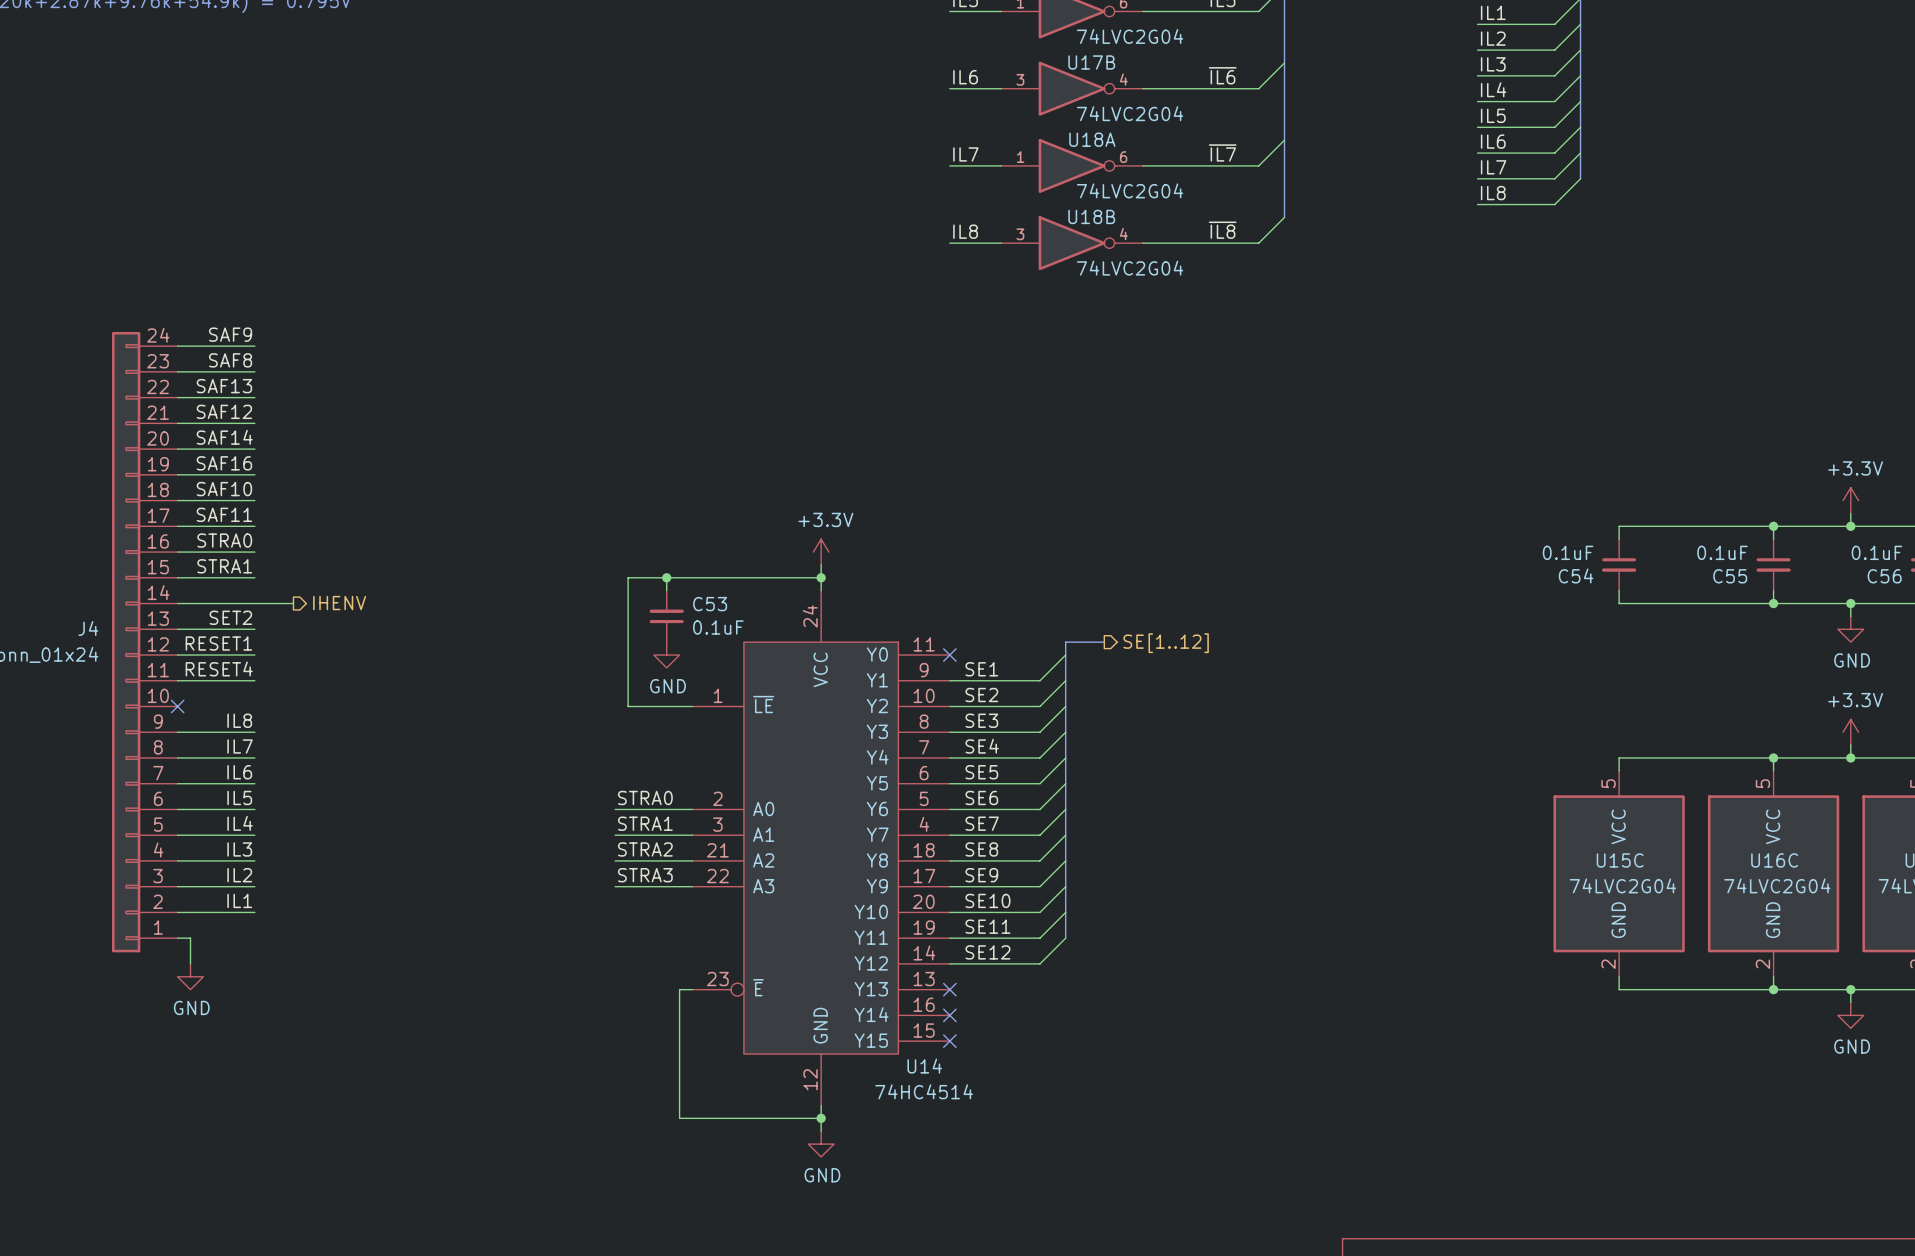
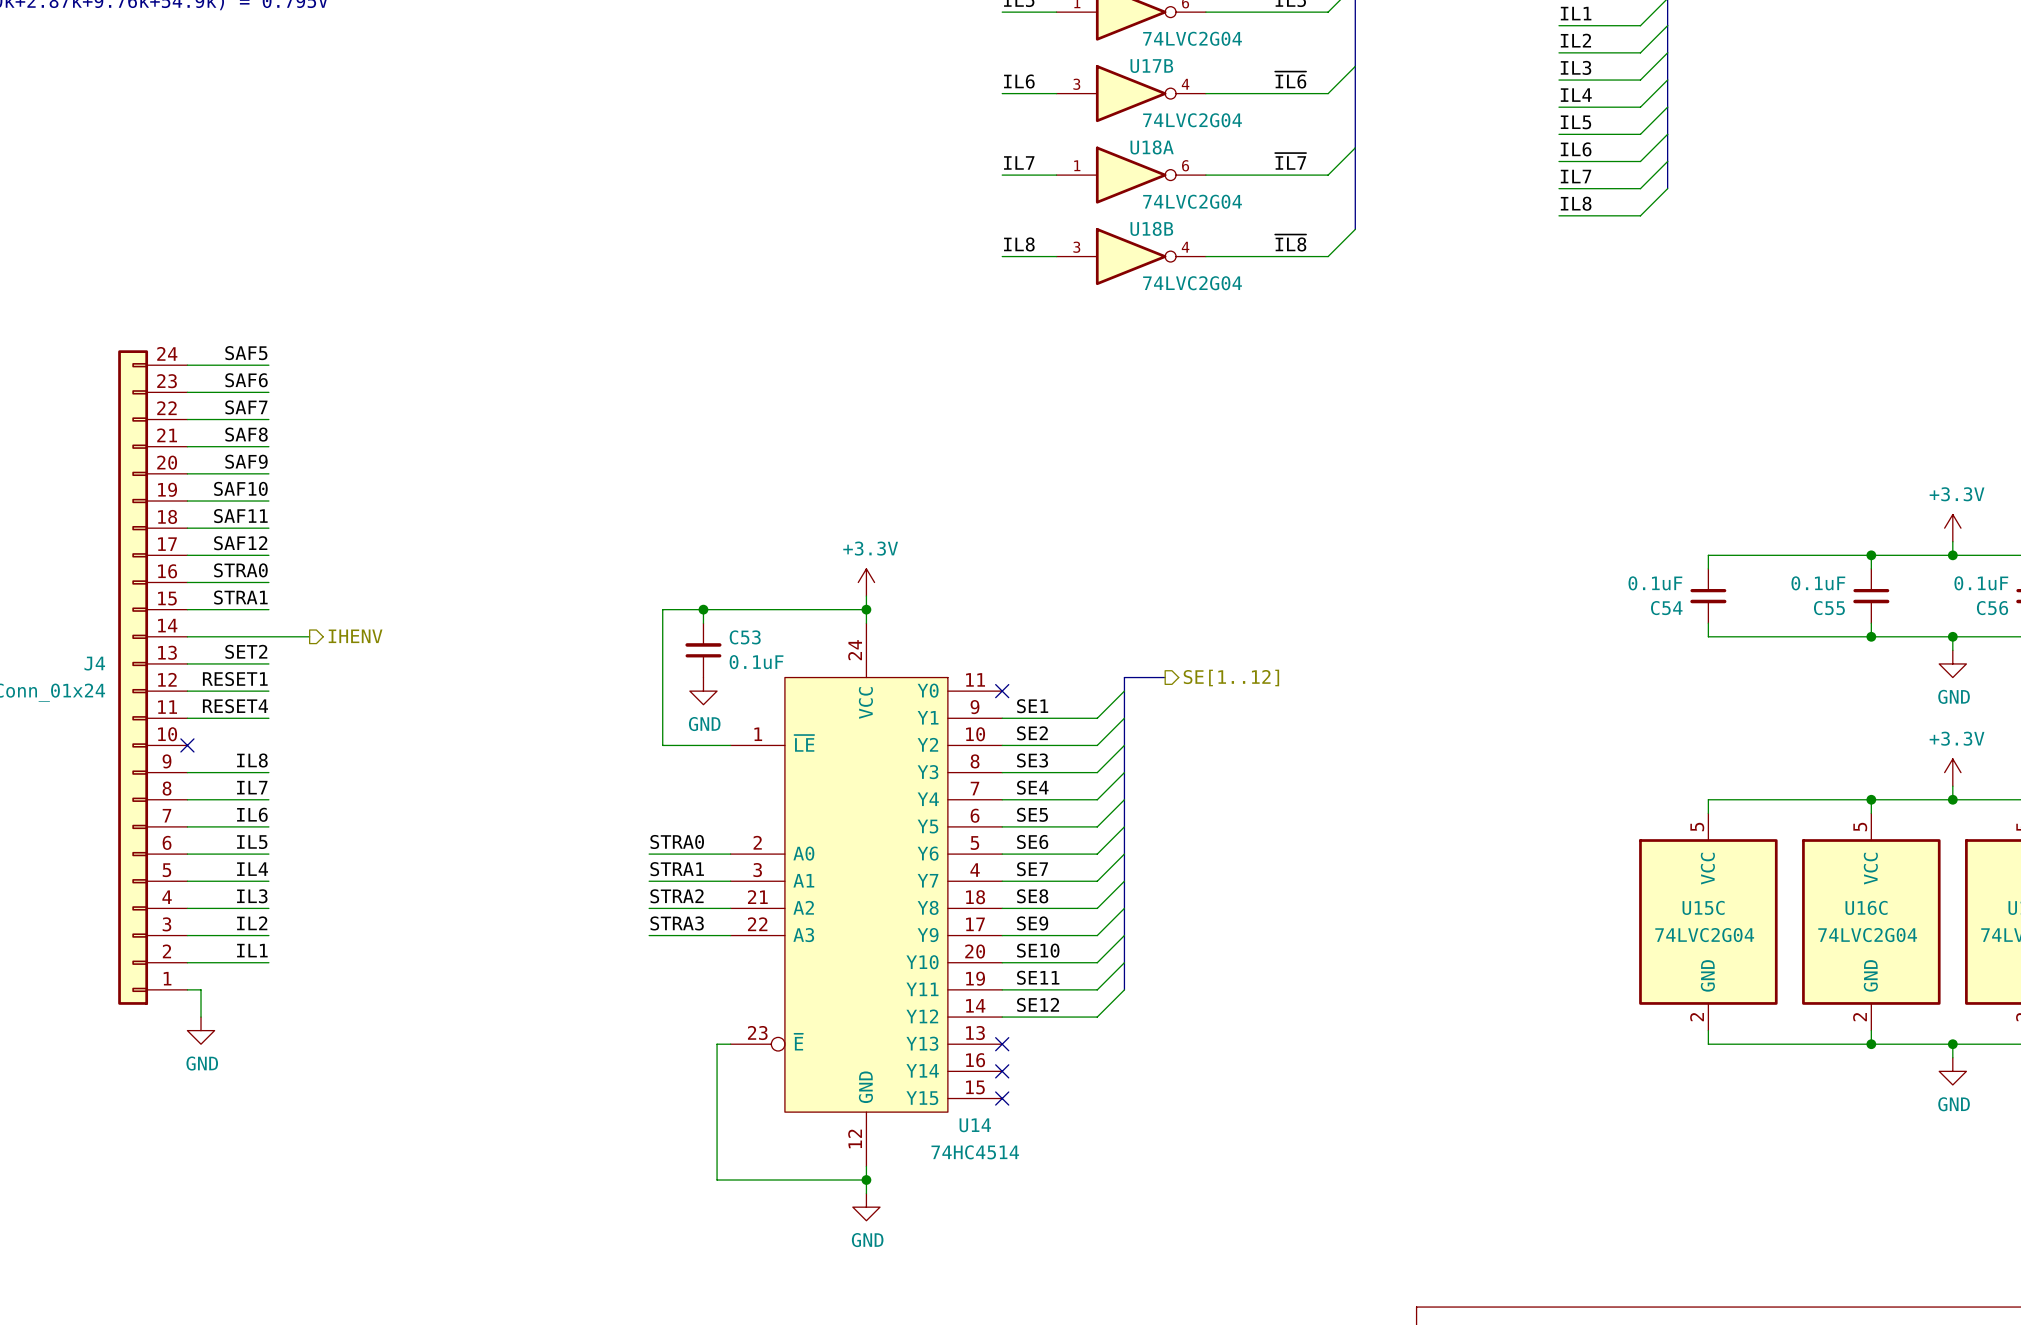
label: SAF9 (230, 334) -> SAF5 (246, 353)
label: SAF8 (230, 360) -> SAF6 (246, 380)
label: SAF13 (224, 386) -> SAF7 (246, 407)
label: SAF12 (224, 411) -> SAF8 (246, 434)
label: SAF14 (224, 437) -> SAF9 (246, 461)
label: SAF16 (224, 463) -> SAF10 (240, 488)
label: SAF10 (224, 489) -> SAF11 (240, 516)
label: SAF11 (224, 514) -> SAF12 (240, 543)

